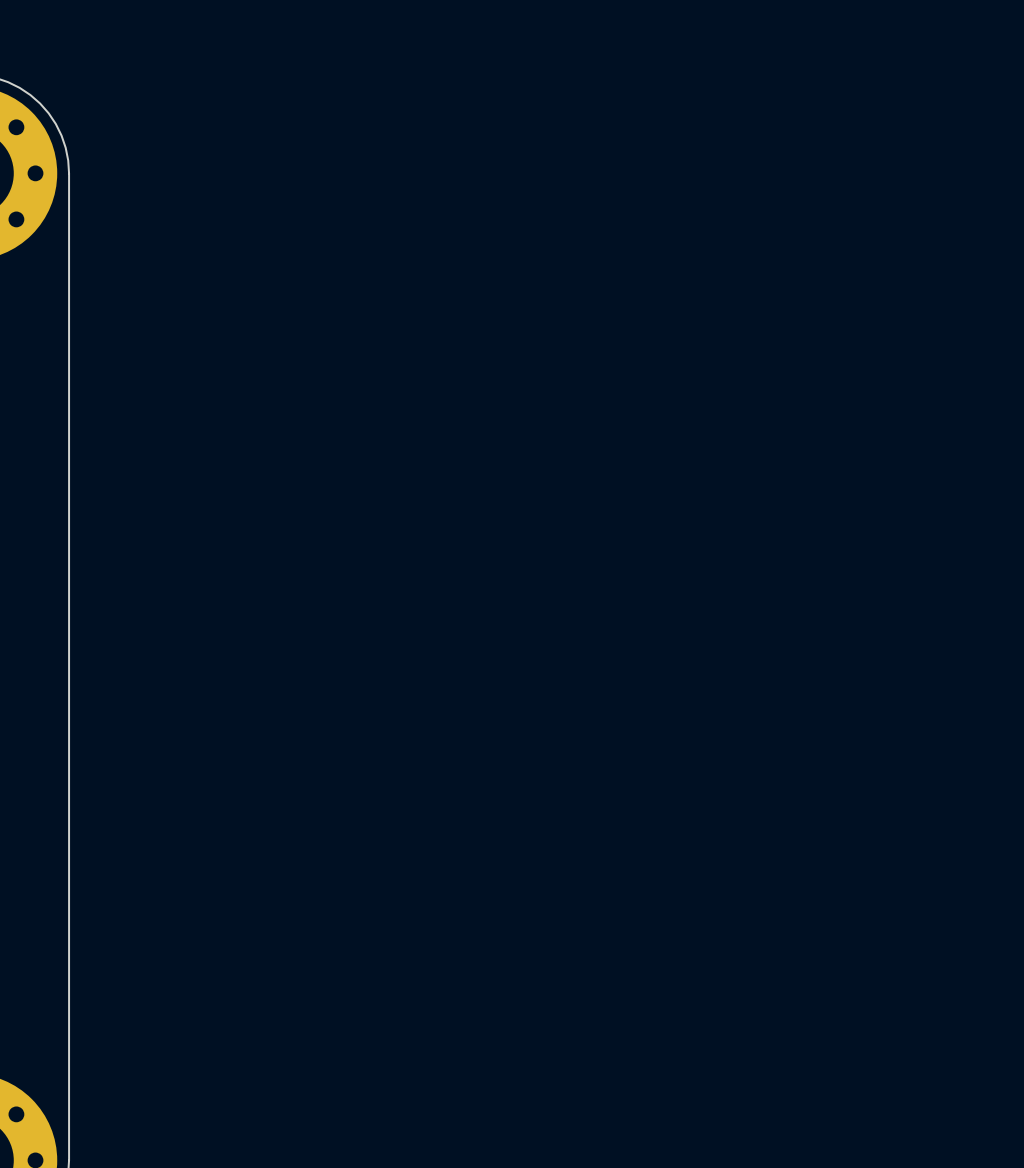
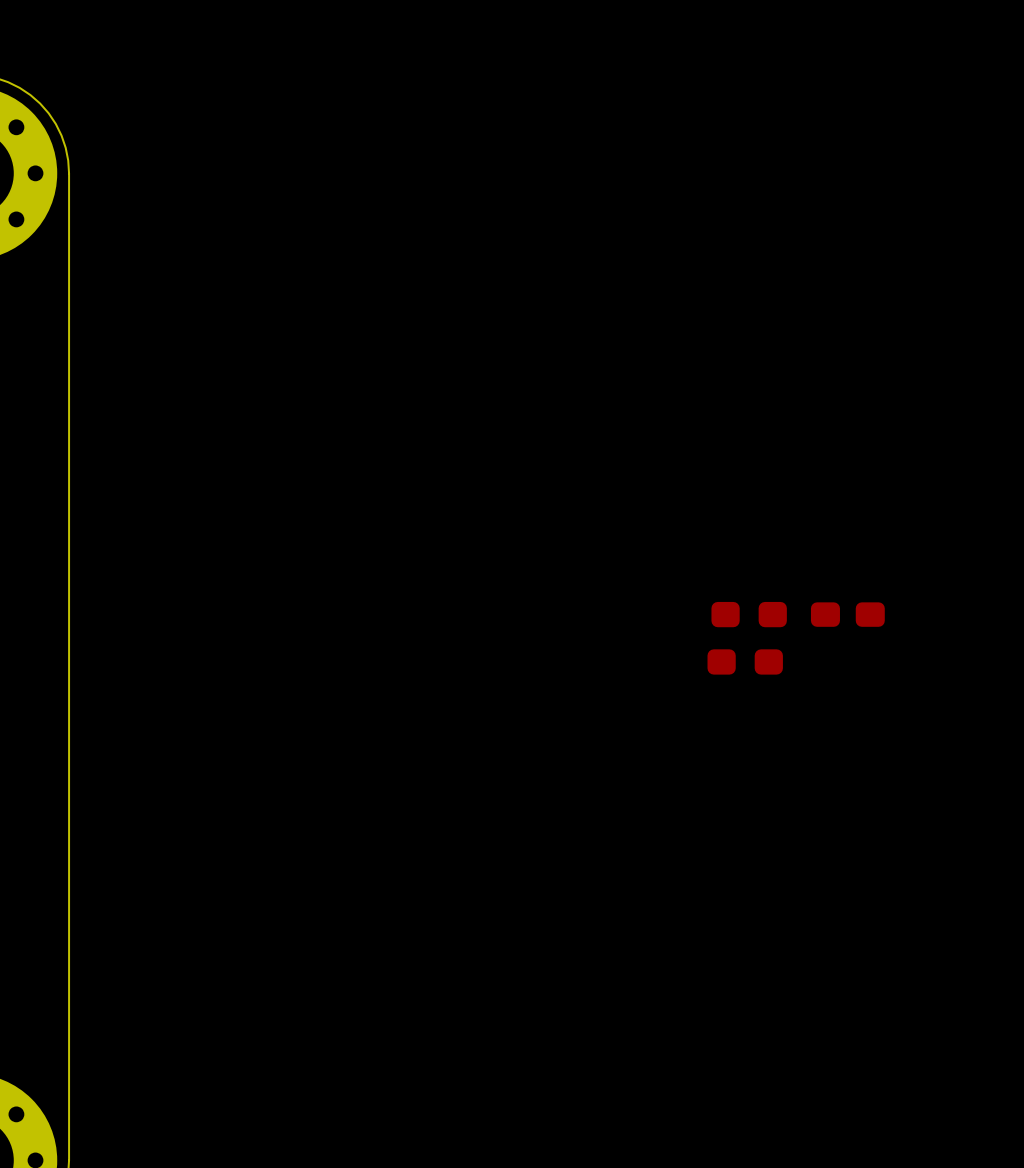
part: none -> (749, 614)
part: none -> (847, 614)
part: none -> (745, 661)

